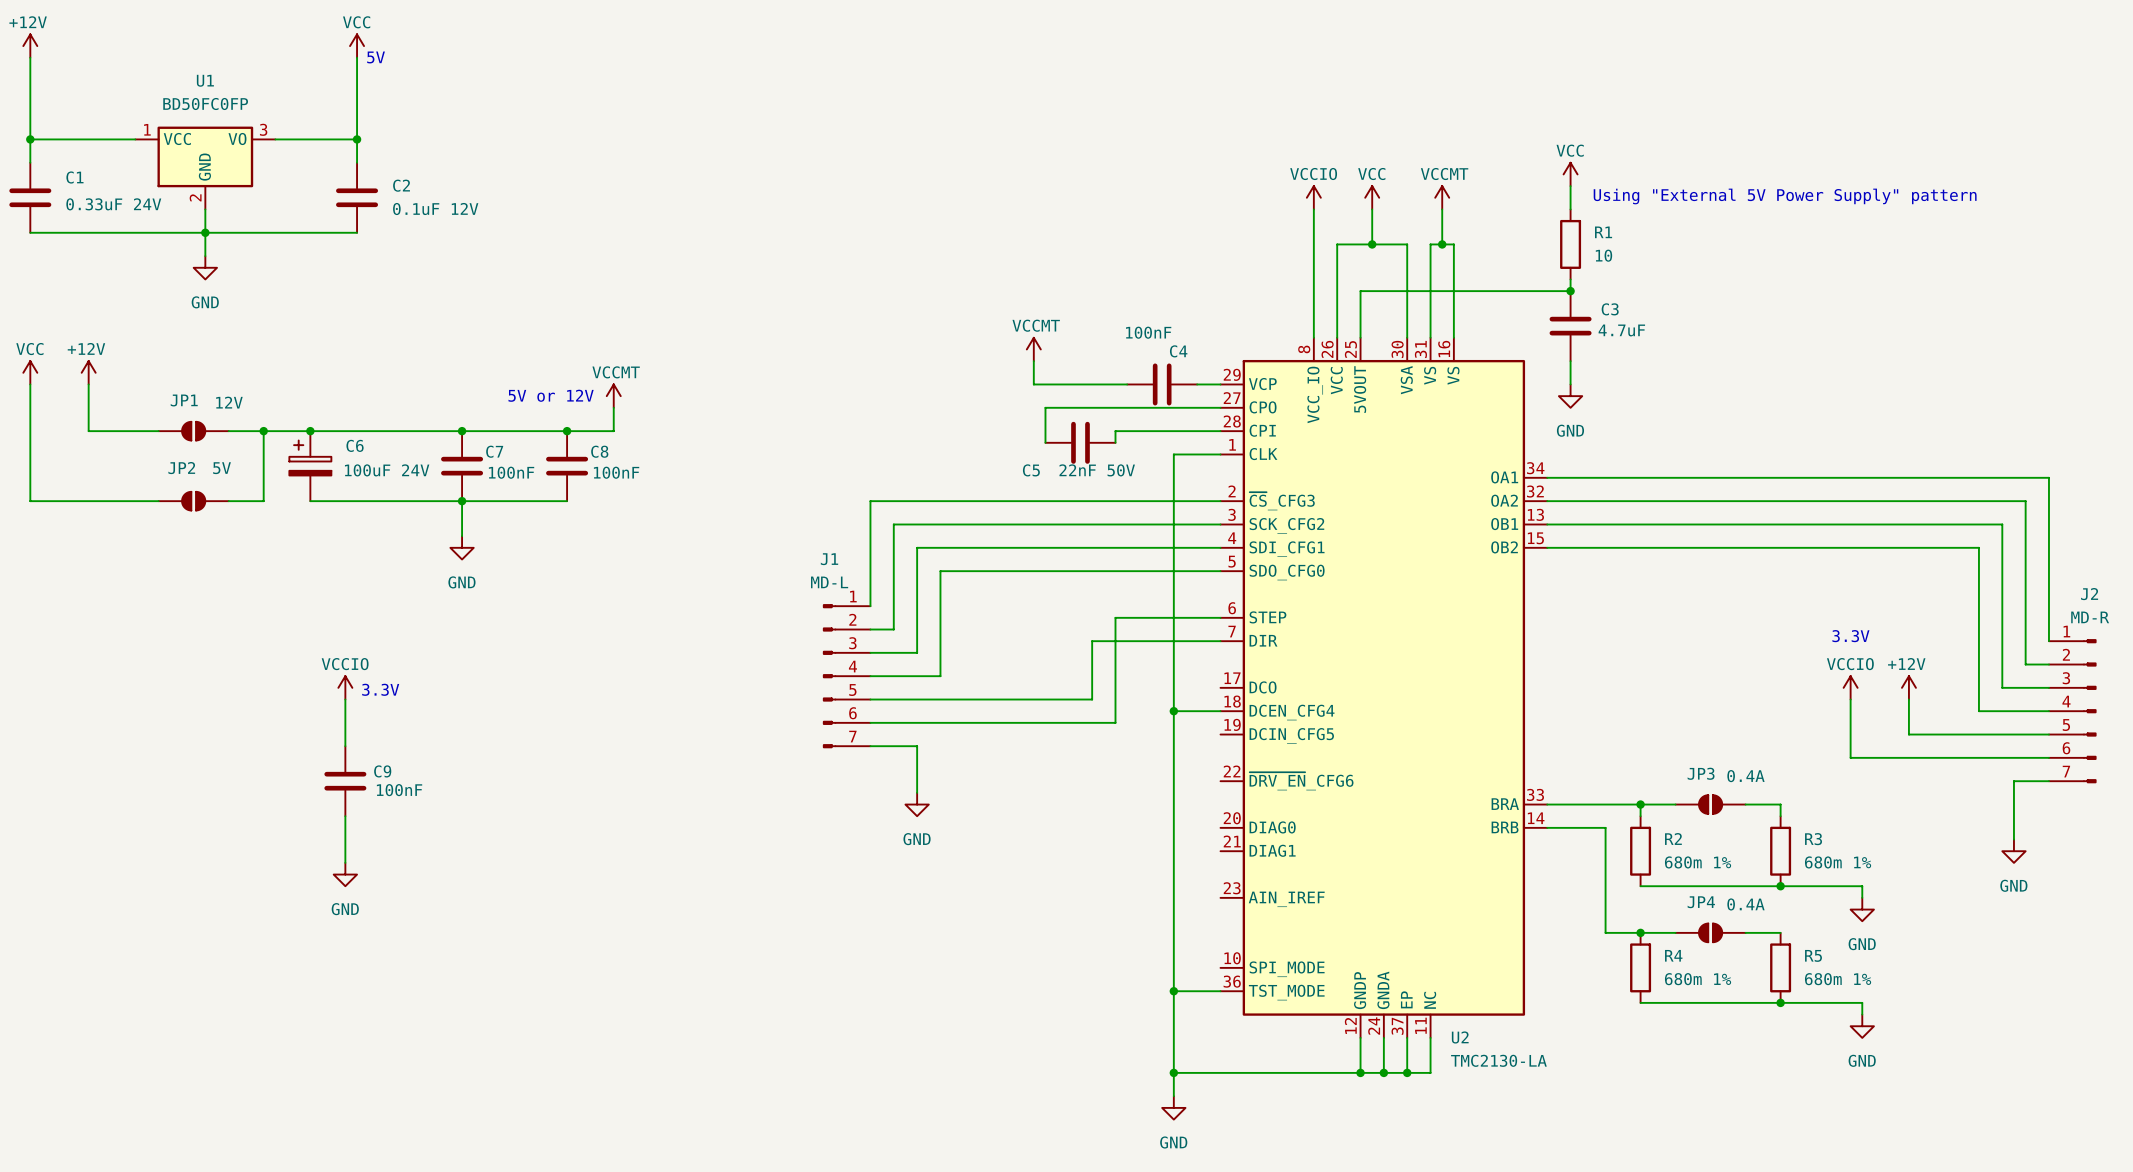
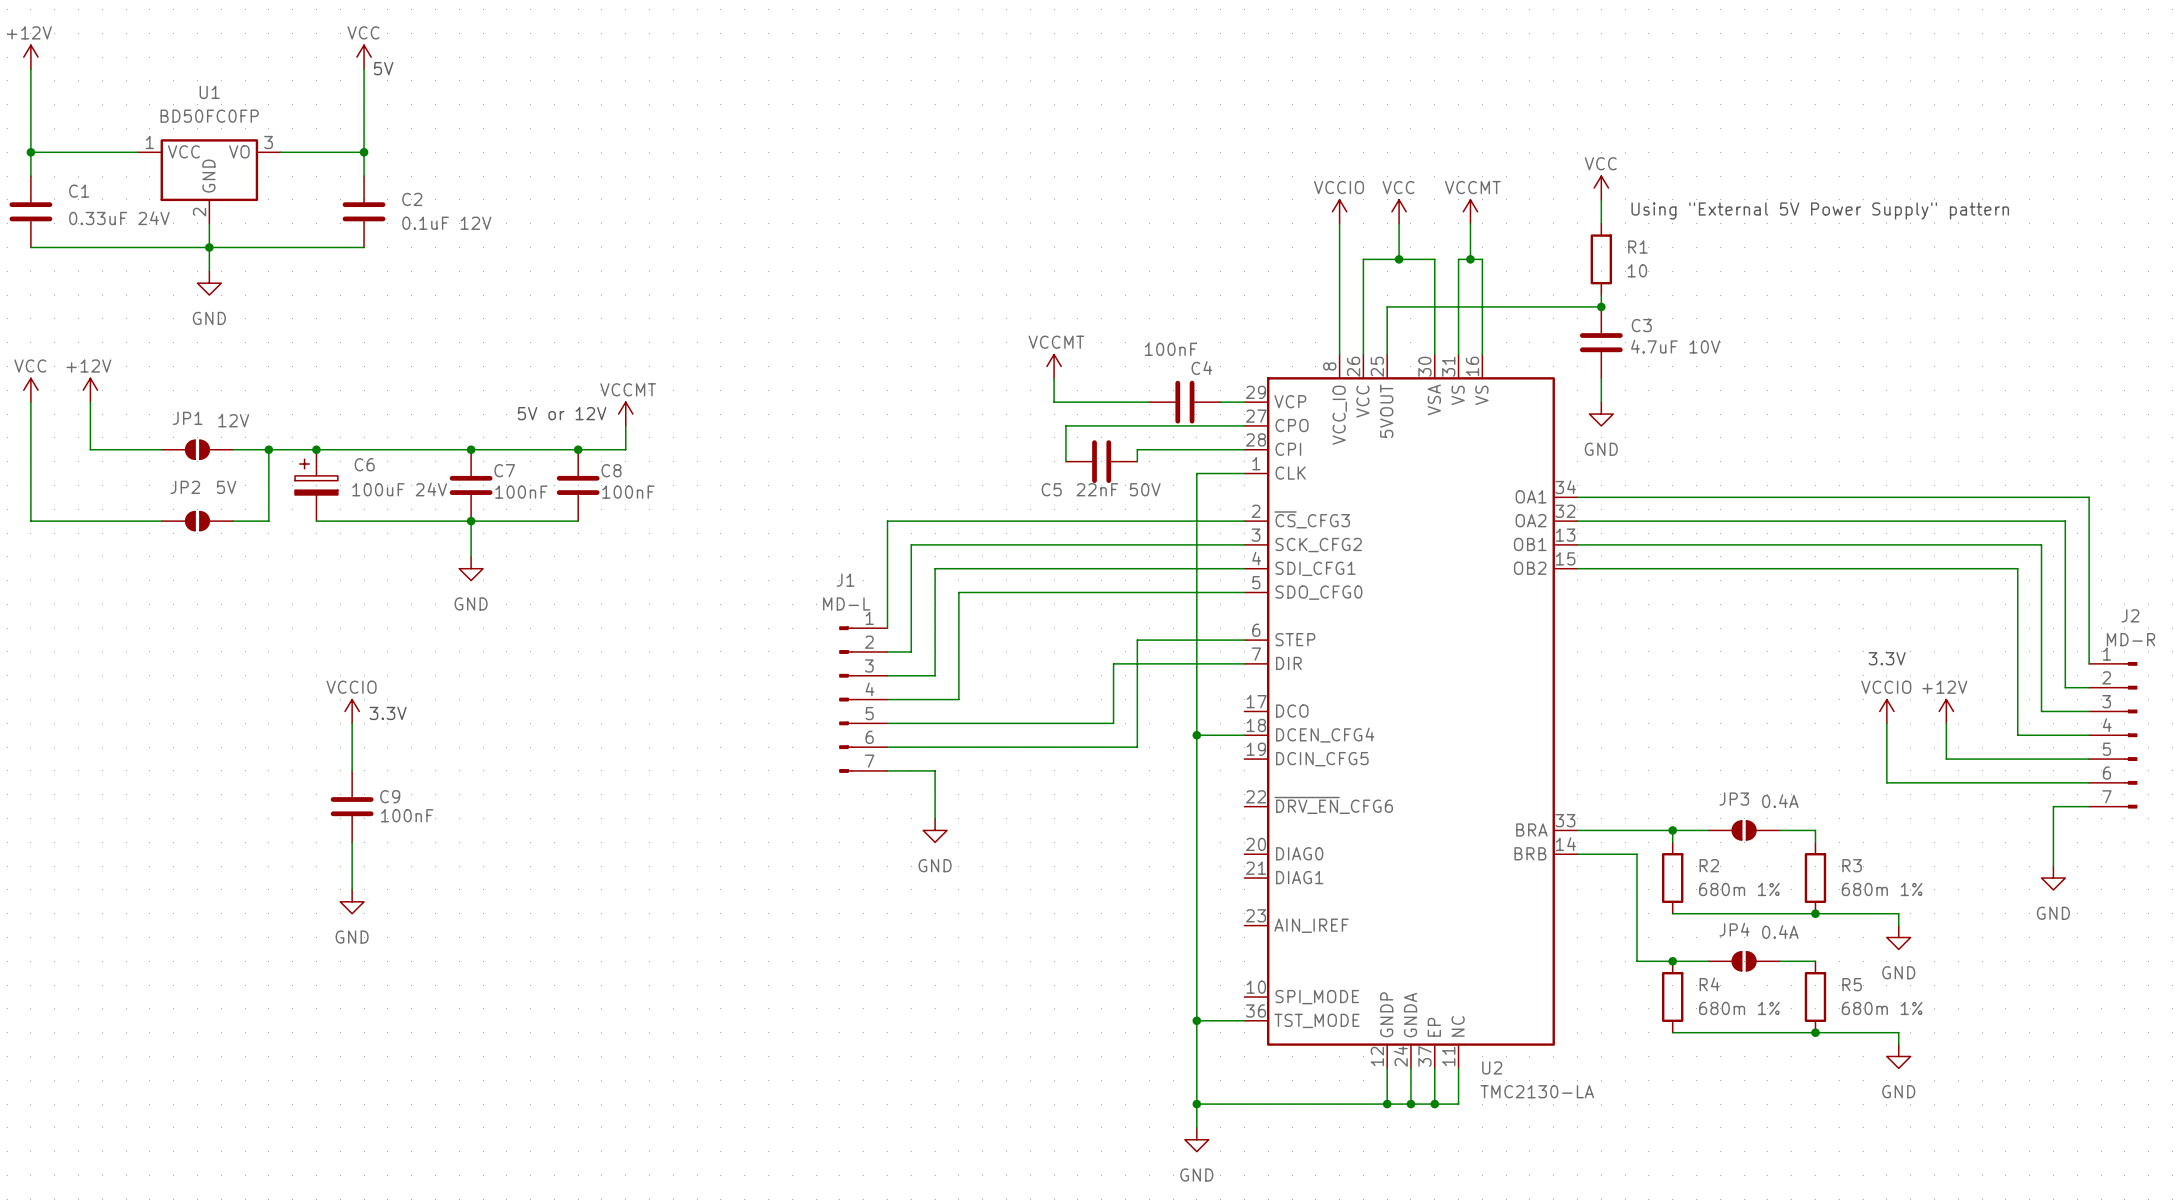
C3 value: 4.7uF (1621, 330) -> 4.7uF 10V (1675, 346)

